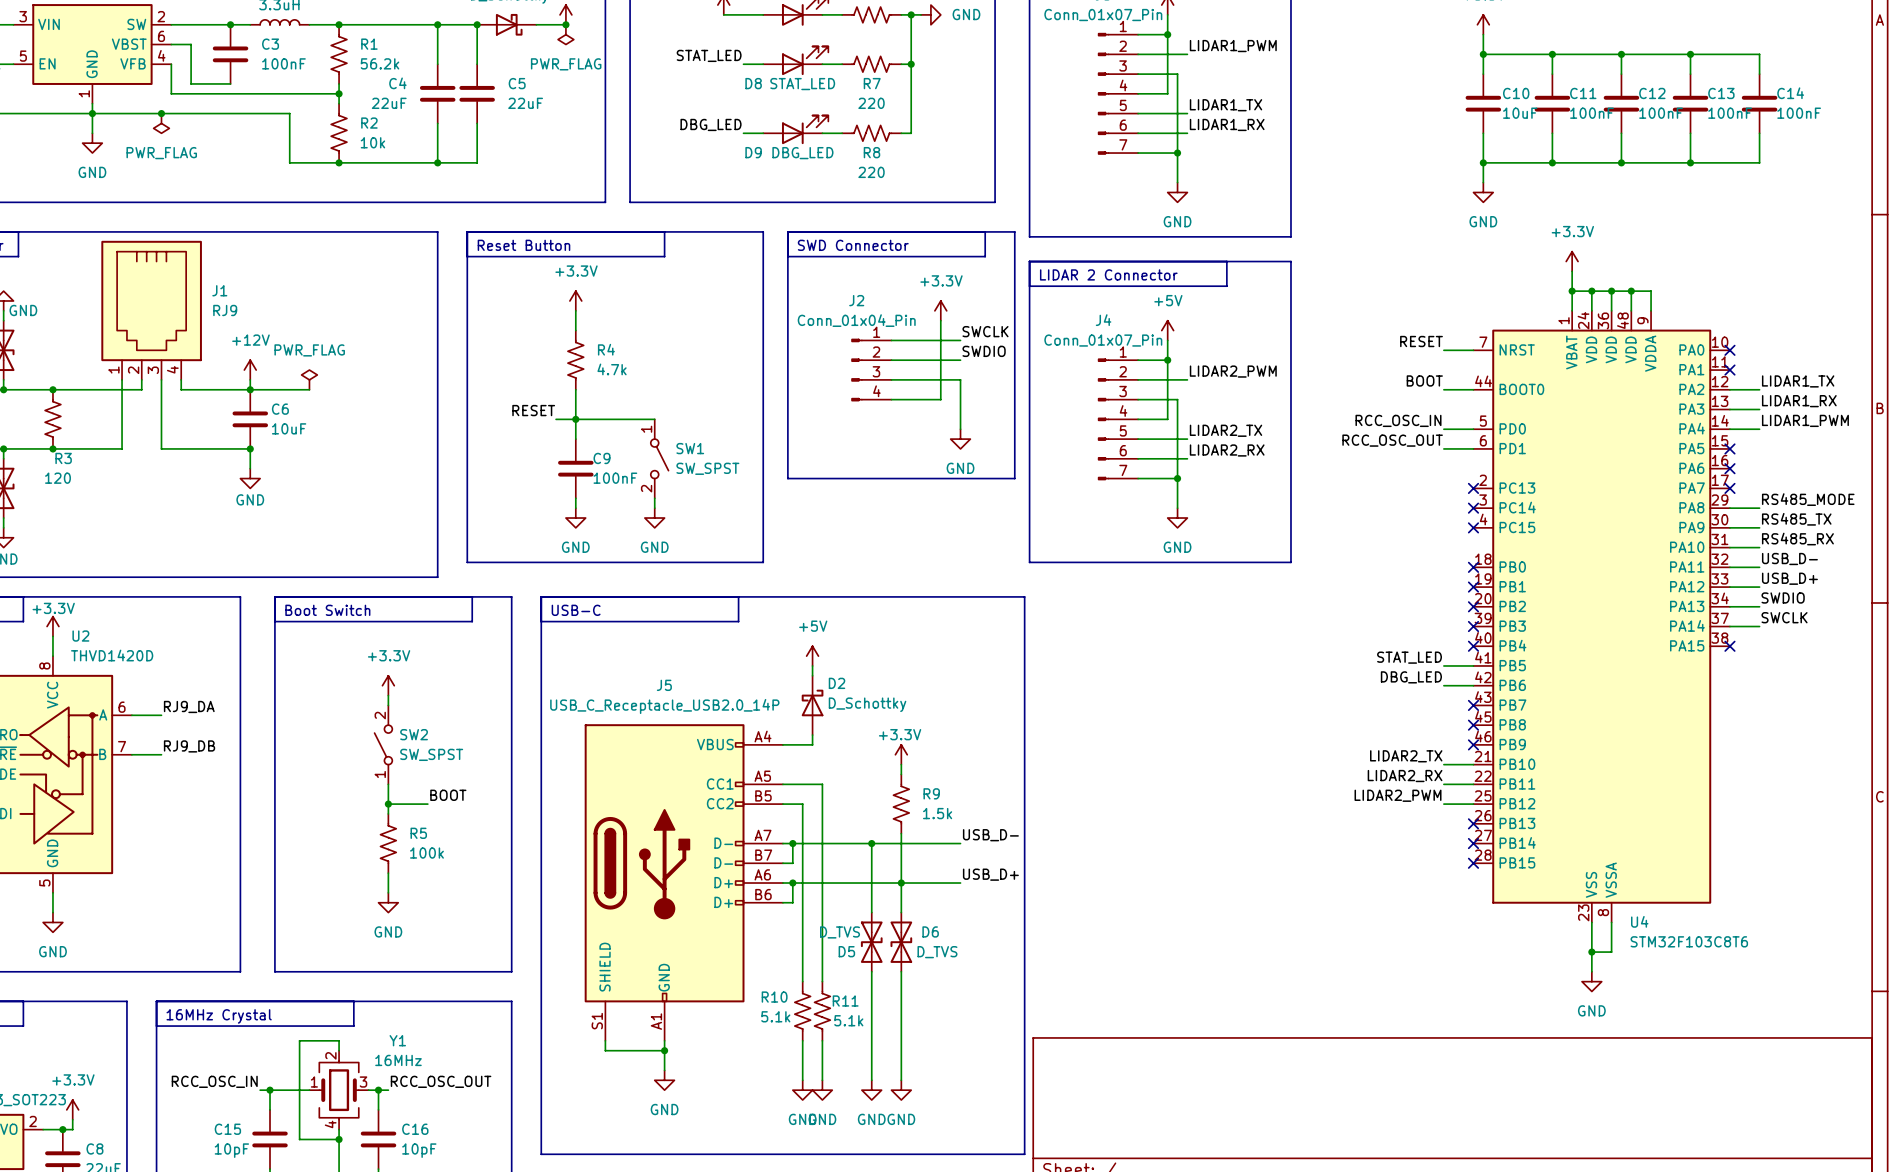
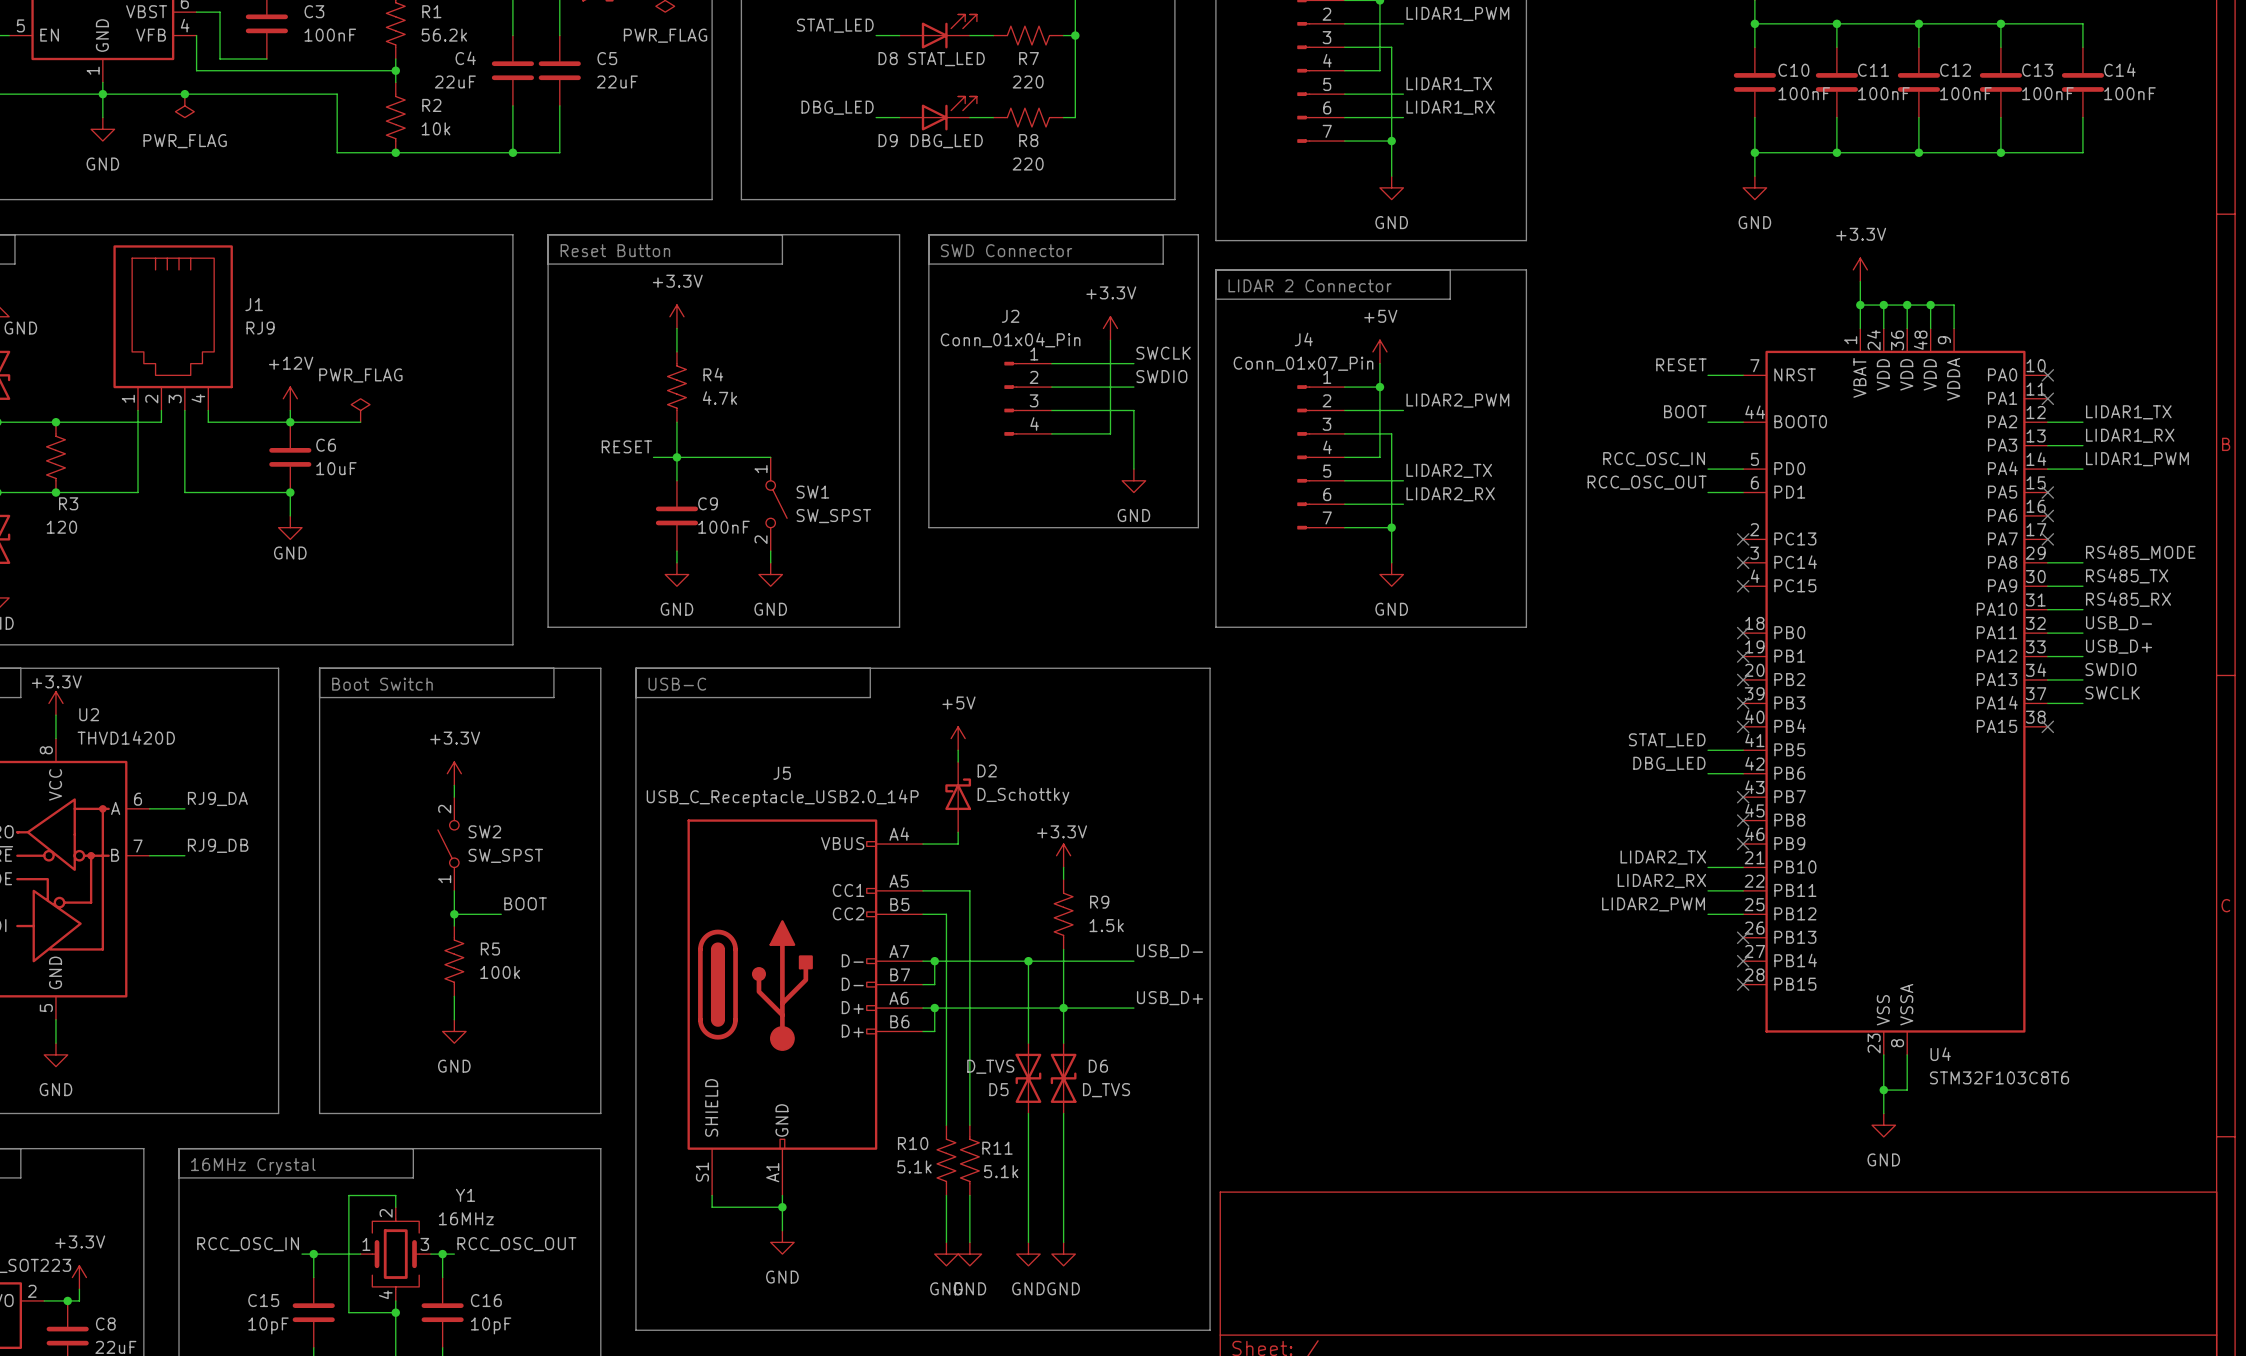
C10 value: 10uF (1520, 113) -> 100nF (1804, 93)

